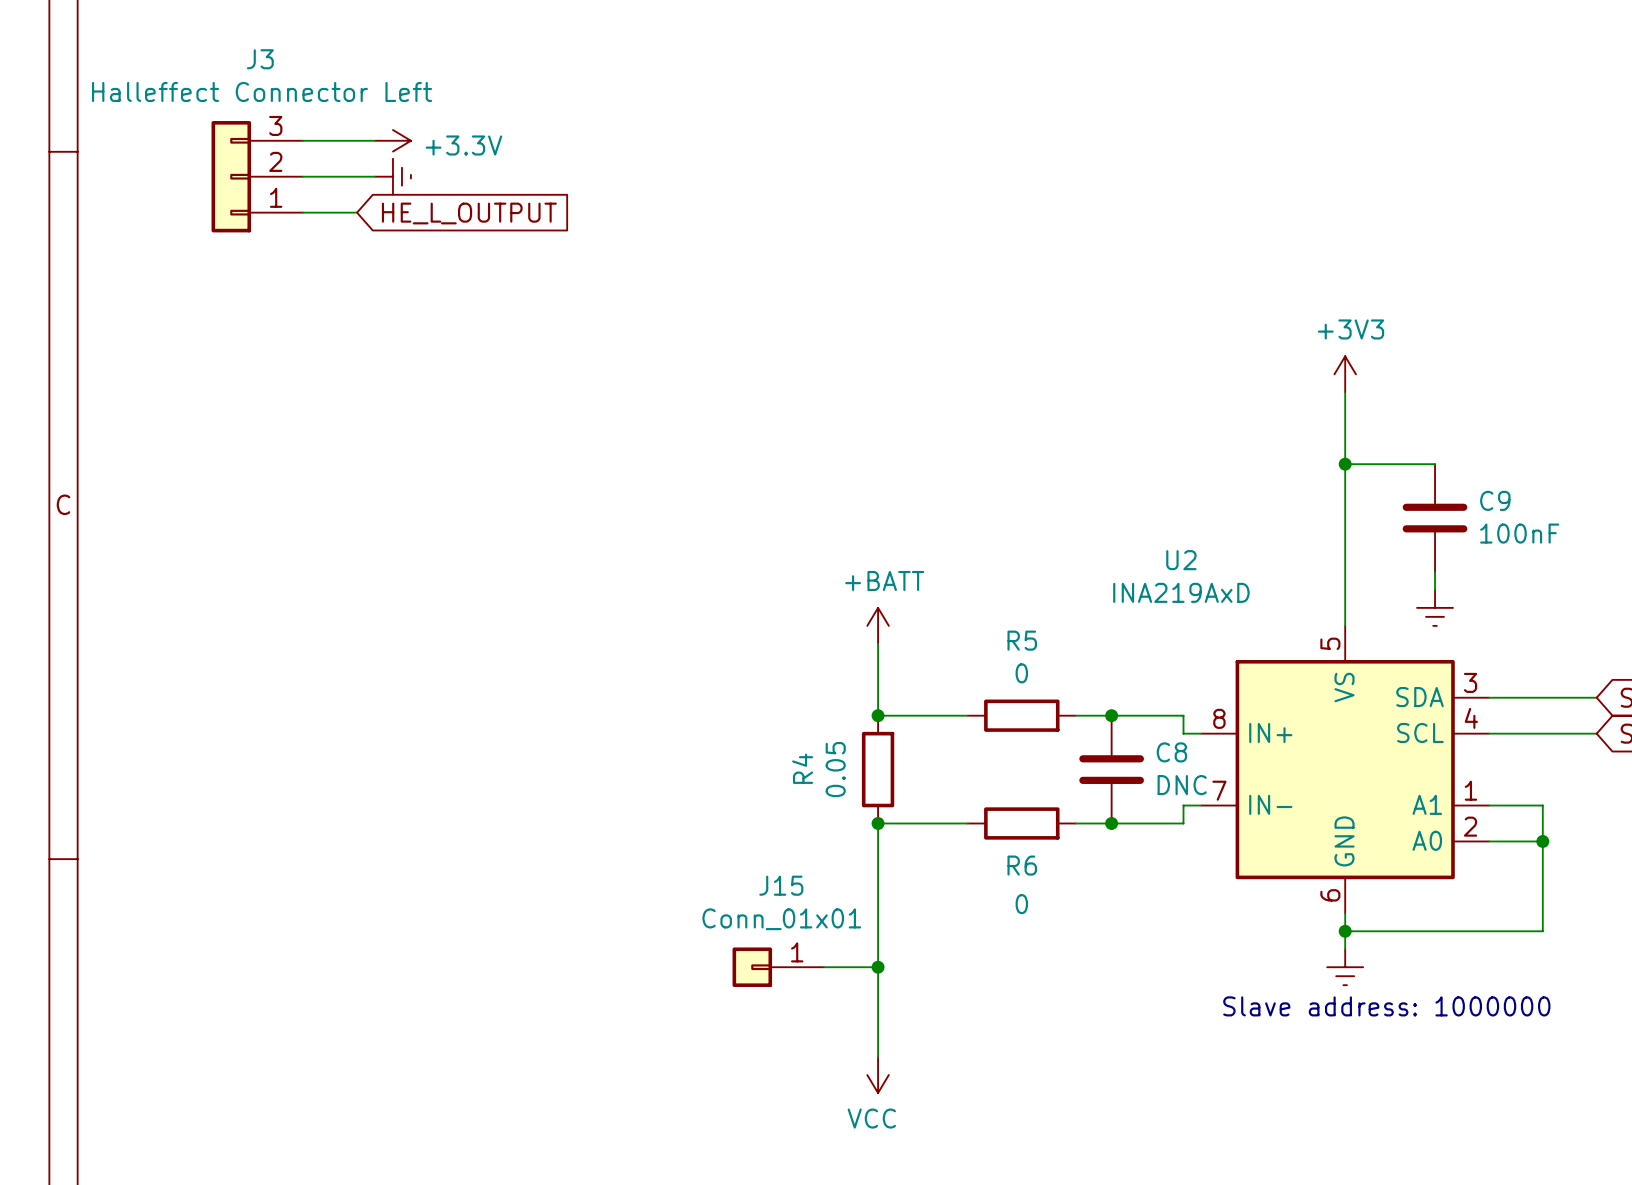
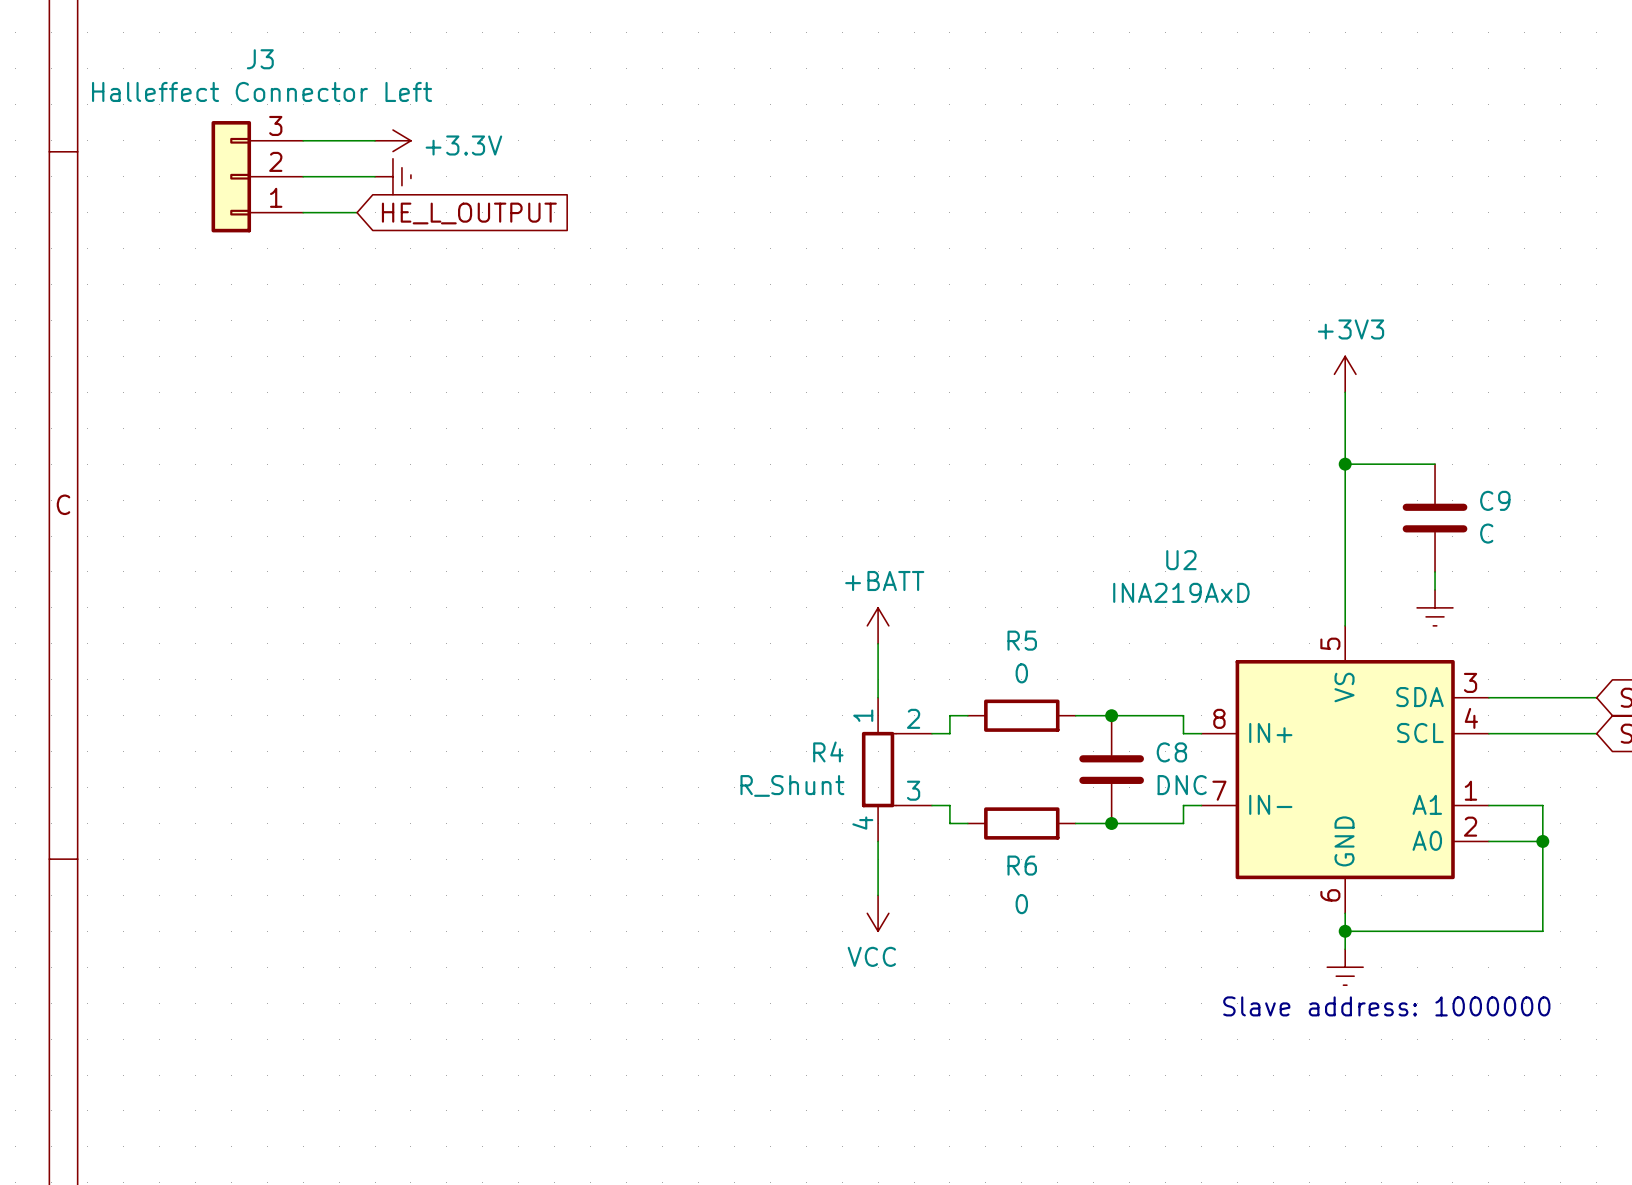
C9 value: 100nF (1519, 533) -> C (1486, 533)
wire: (878, 697) (878, 715) (949, 715) -> (931, 733) (949, 733) (949, 715)
R4 symbol: [861, 715, 895, 824] -> [861, 697, 932, 842]
junction: (878, 715) -> none
R4 value: 0.05 (835, 769) -> R_Shunt (792, 785)
junction: (878, 823) -> none
wire: (949, 823) (878, 823) (878, 841) -> (949, 823) (949, 805) (931, 805)
wire: (878, 895) (878, 1057) -> none
J15: Conn_01x01 (778, 967) -> none
wire: (824, 967) (878, 967) -> none
junction: (878, 967) -> none
power symbol position: VCC (878, 1075) -> VCC (878, 913)

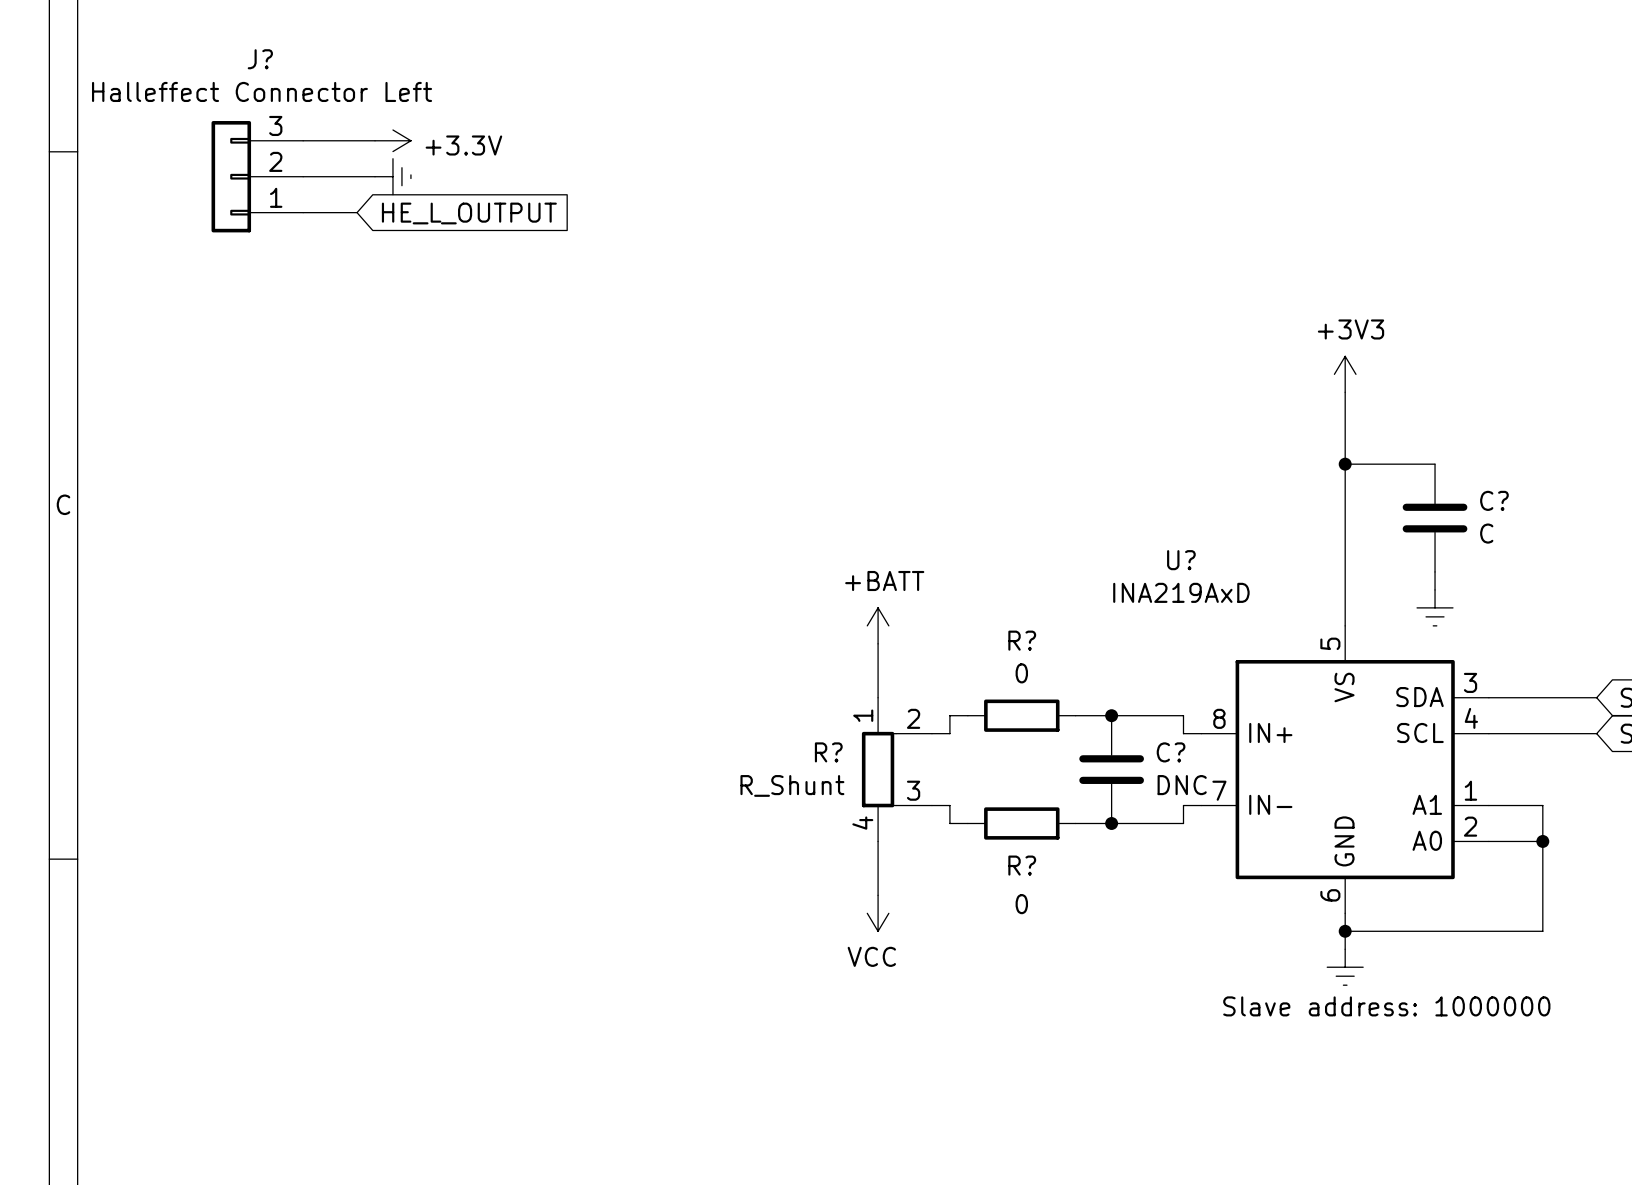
J3 name: J3 (260, 59) -> J? (260, 59)
C9 name: C9 (1495, 500) -> C? (1494, 500)
U2 name: U2 (1181, 560) -> U? (1181, 560)
R5 name: R5 (1022, 640) -> R? (1022, 640)
R4 name: R4 (828, 751) -> R? (828, 752)
C8 name: C8 (1171, 752) -> C? (1171, 752)
R6 name: R6 (1022, 865) -> R? (1022, 865)

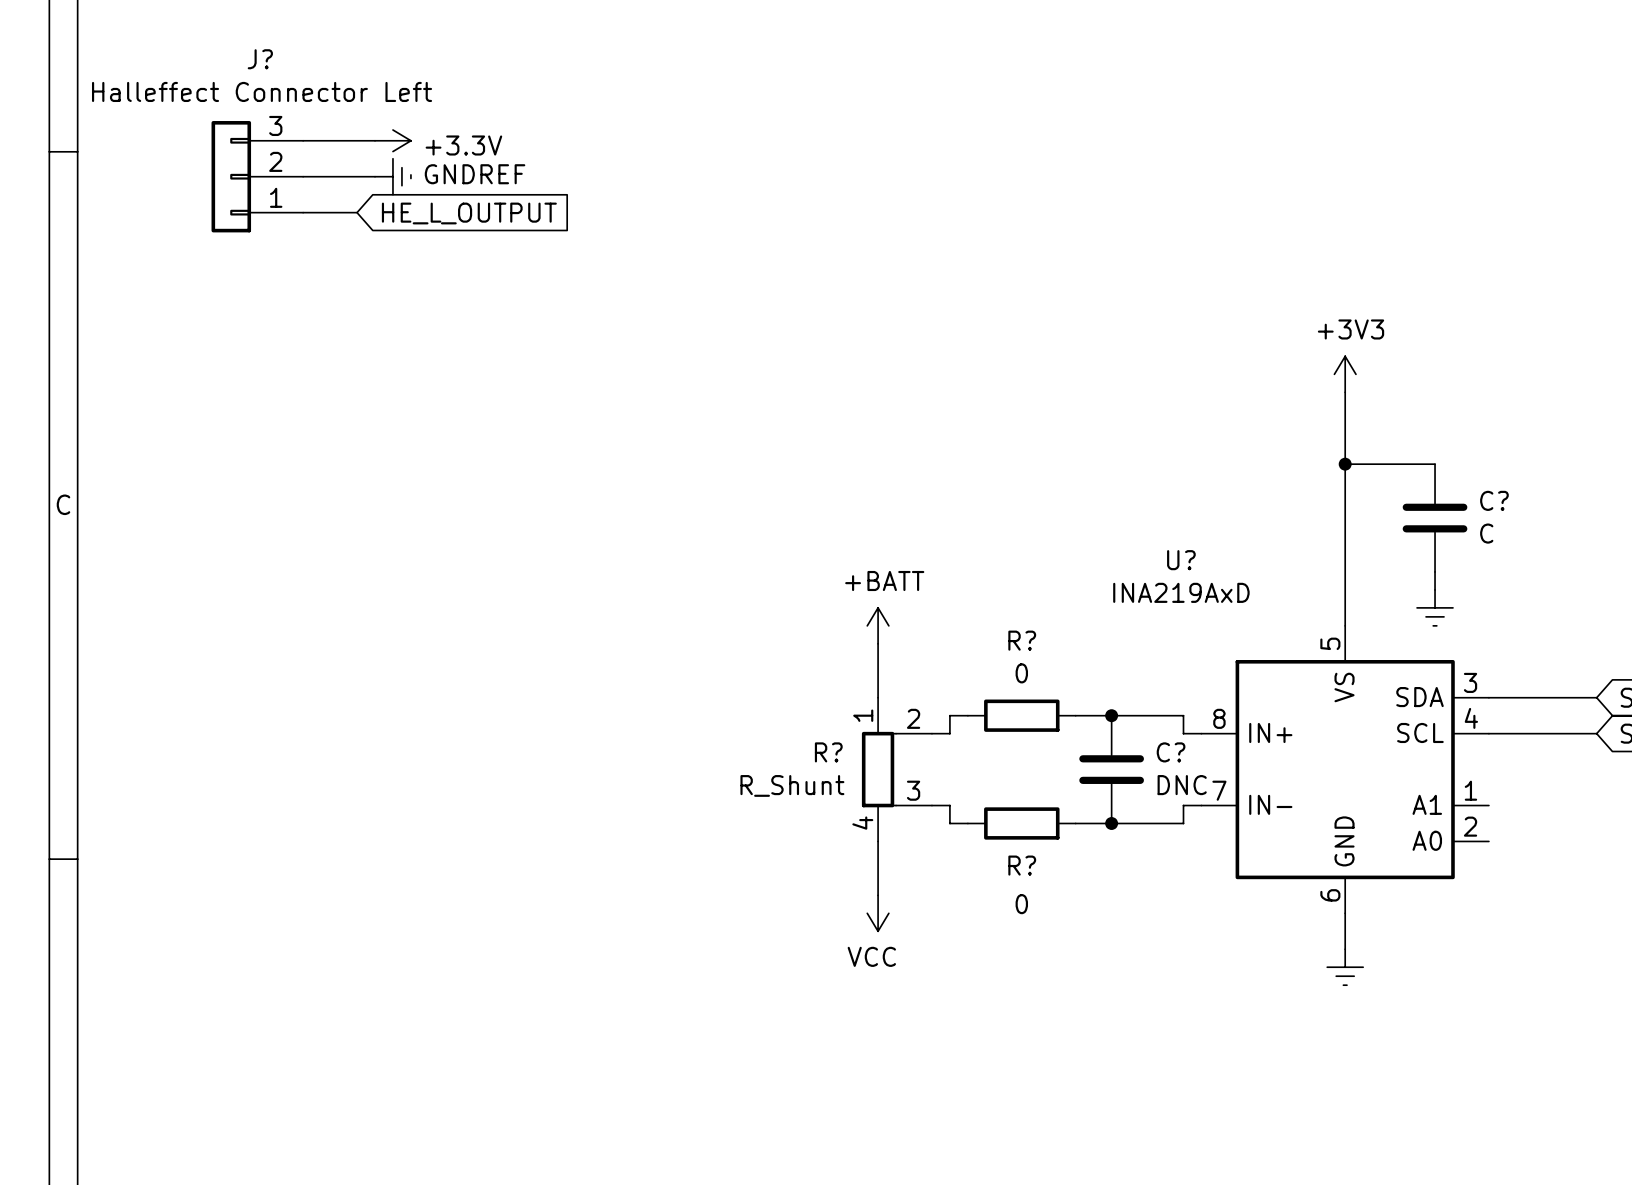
power symbol text: none -> GNDREF (475, 174)
wire: (1488, 805) (1542, 805) (1542, 931) (1345, 931) -> none
wire: (1488, 841) (1542, 841) -> none
junction: (1542, 841) -> none
junction: (1345, 931) -> none
text: Slave address: 1000000 (1386, 1006) -> none

